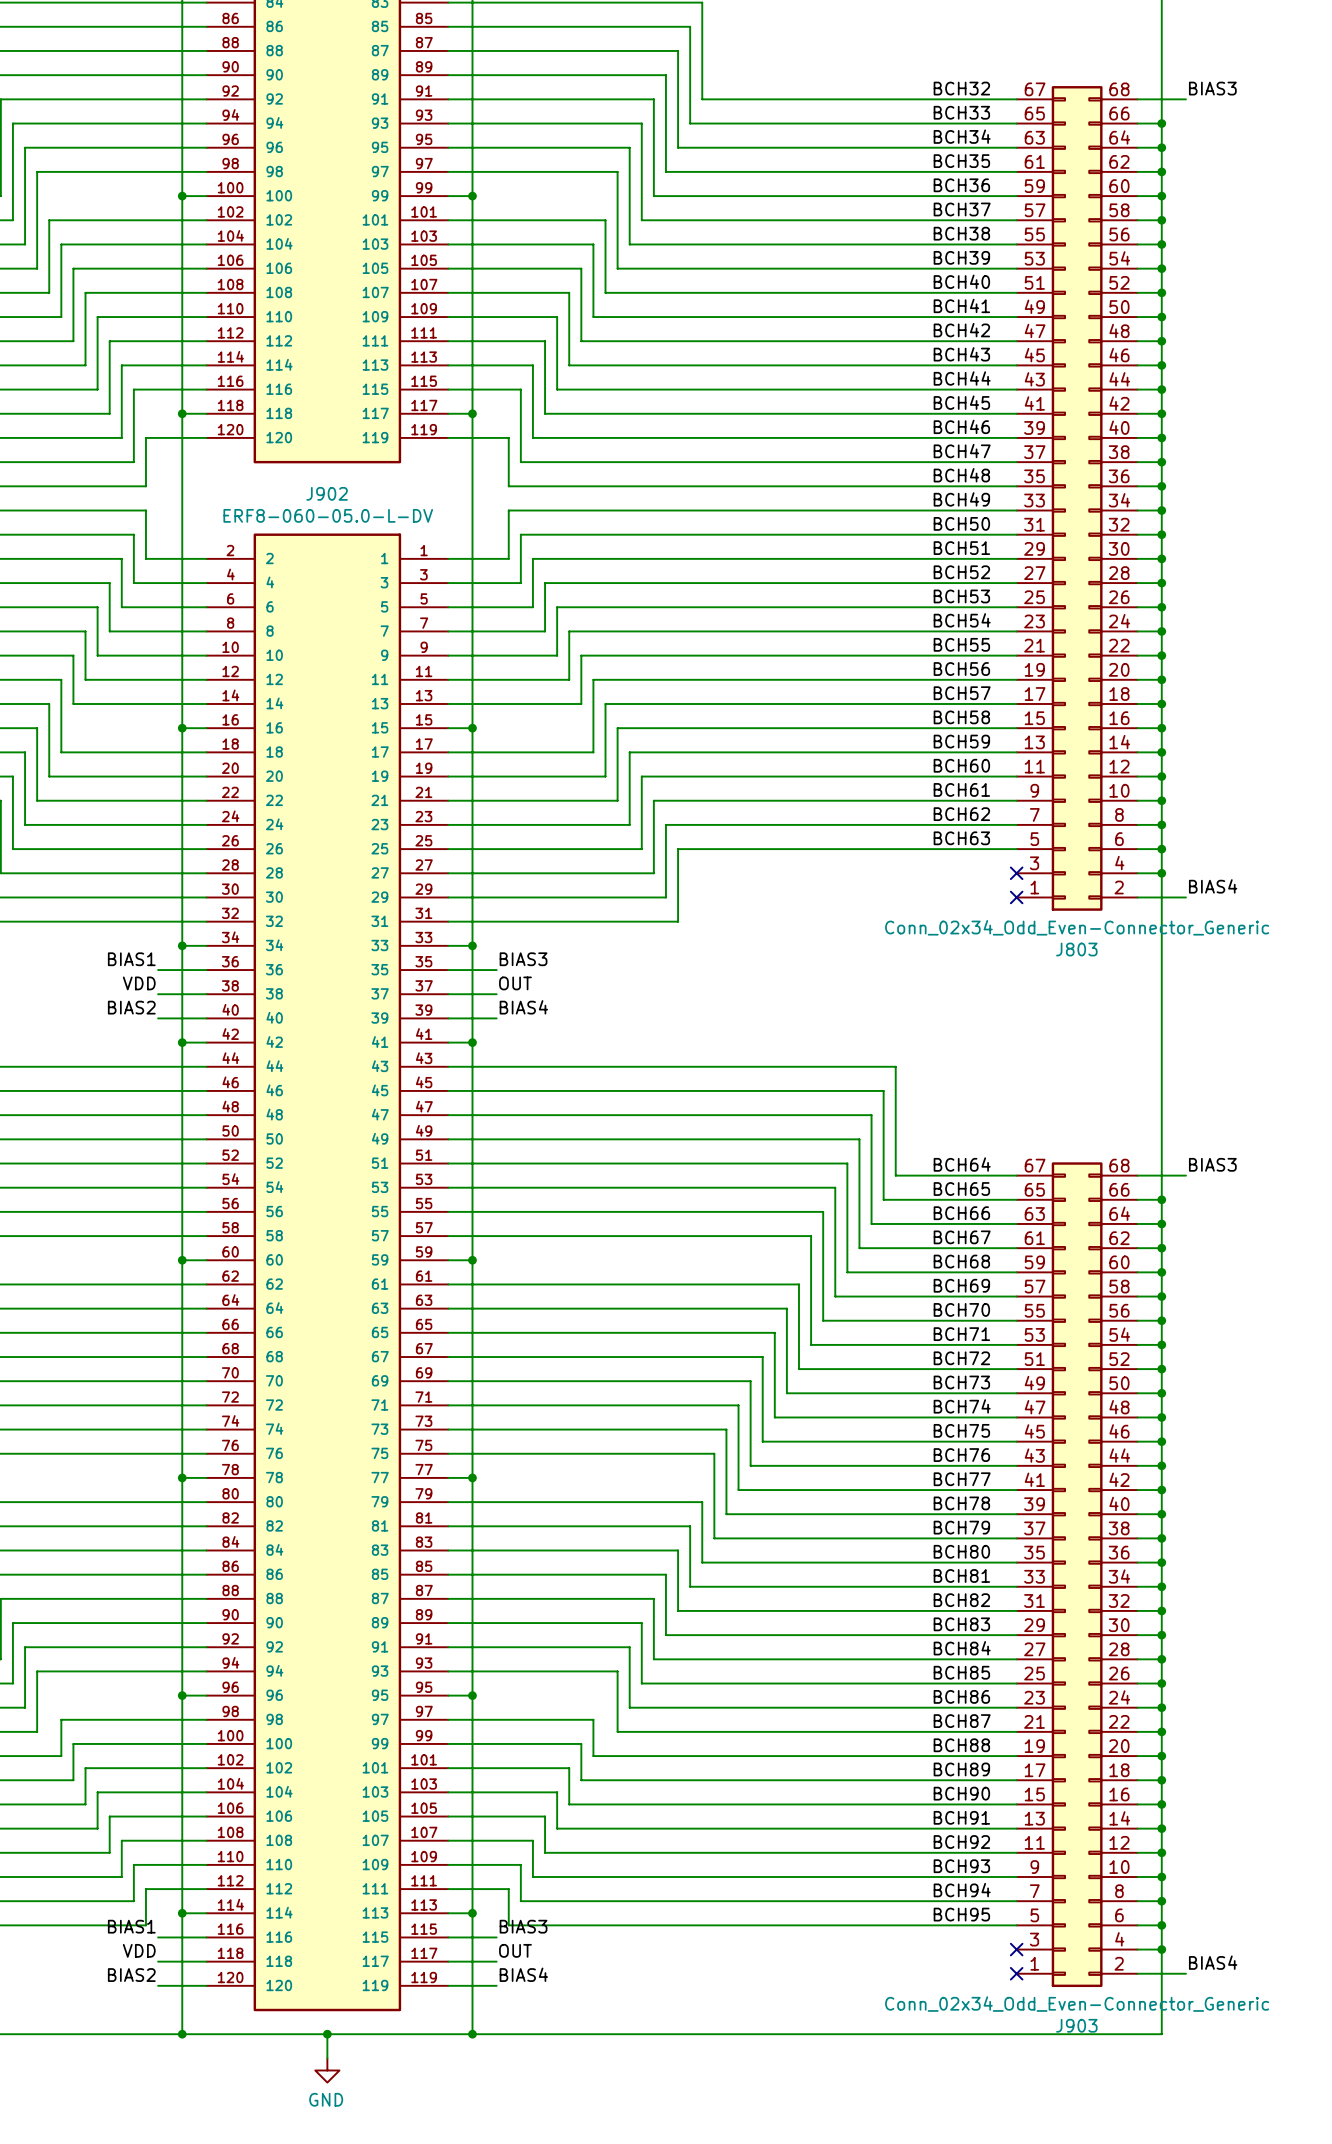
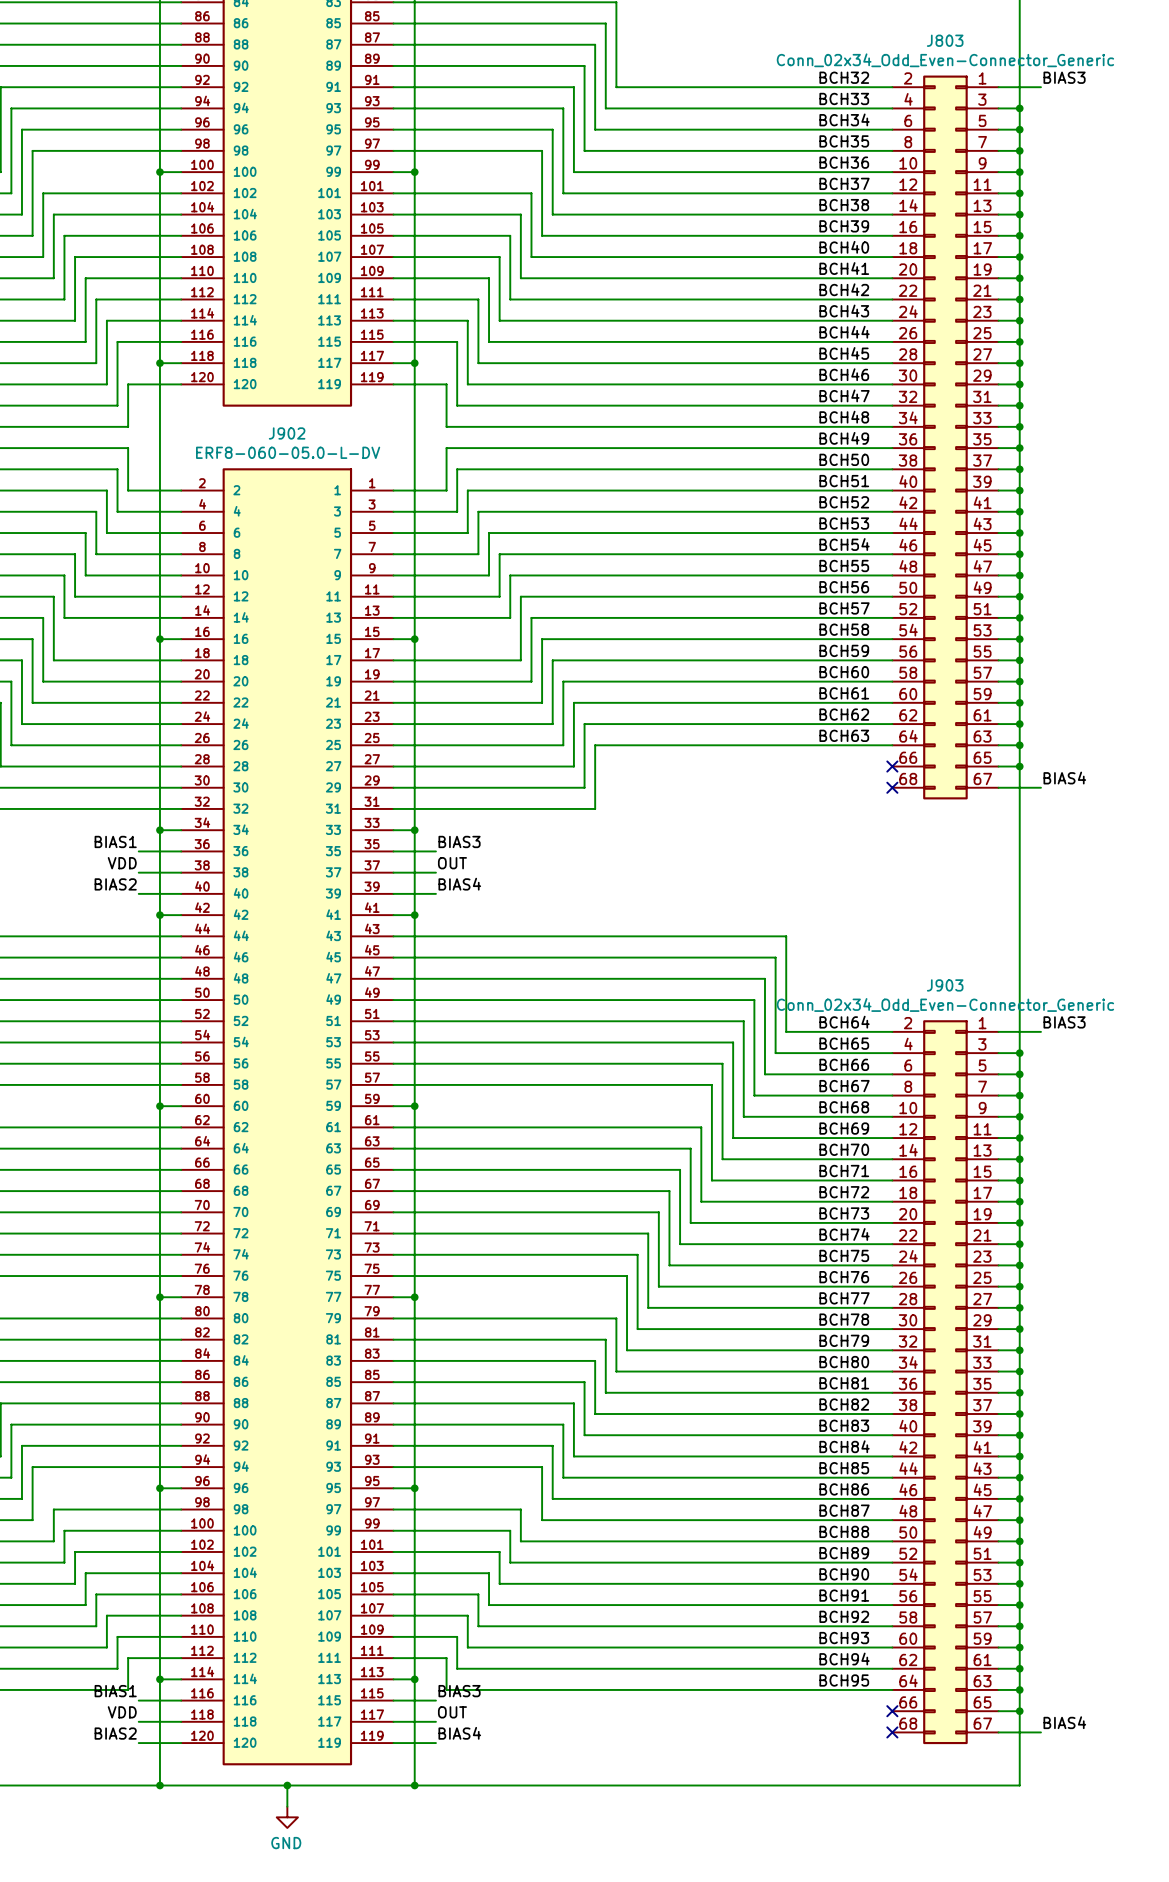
J803 rotation: 0° (1077, 498) -> 180° (945, 437)
J903 rotation: 0° (1077, 1574) -> 180° (945, 1382)

